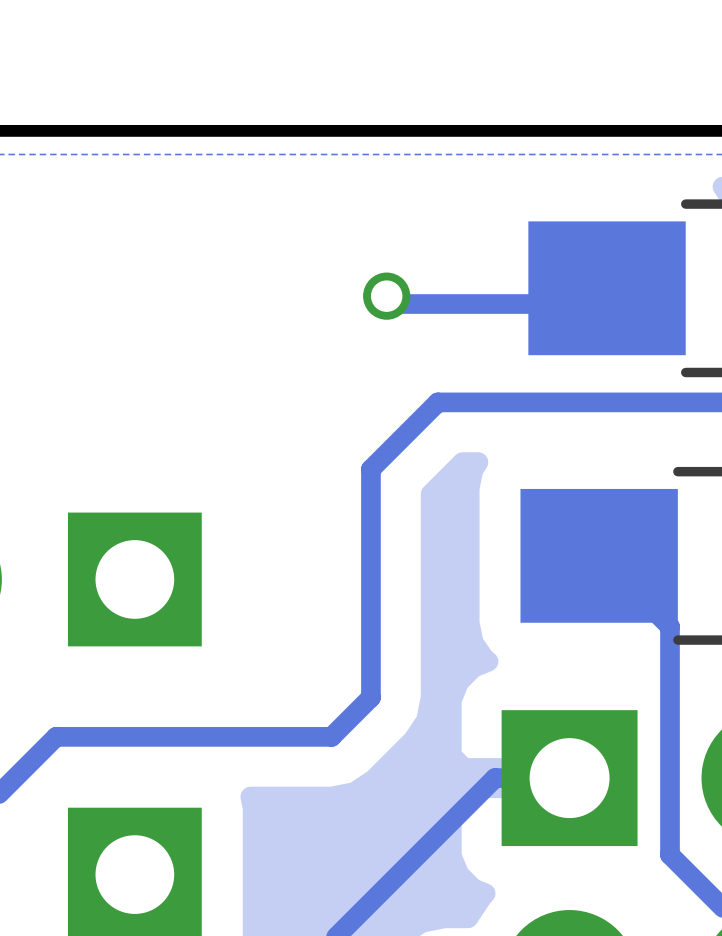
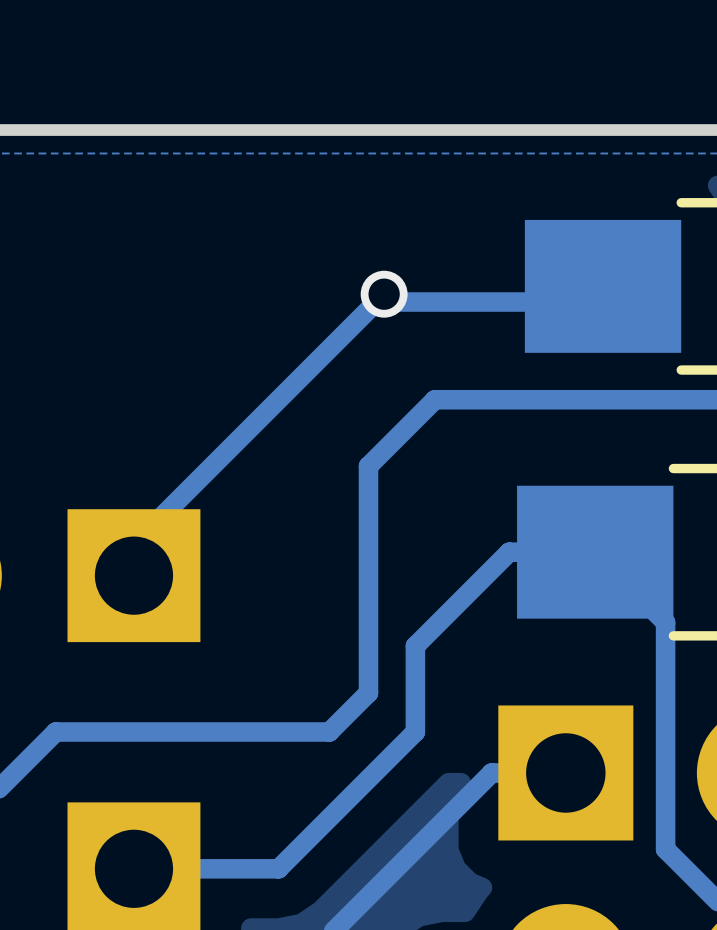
track: none -> (384, 294) (133, 544) (133, 575)
track: none -> (595, 552) (509, 552) (415, 646) (415, 732) (278, 868) (133, 868)

